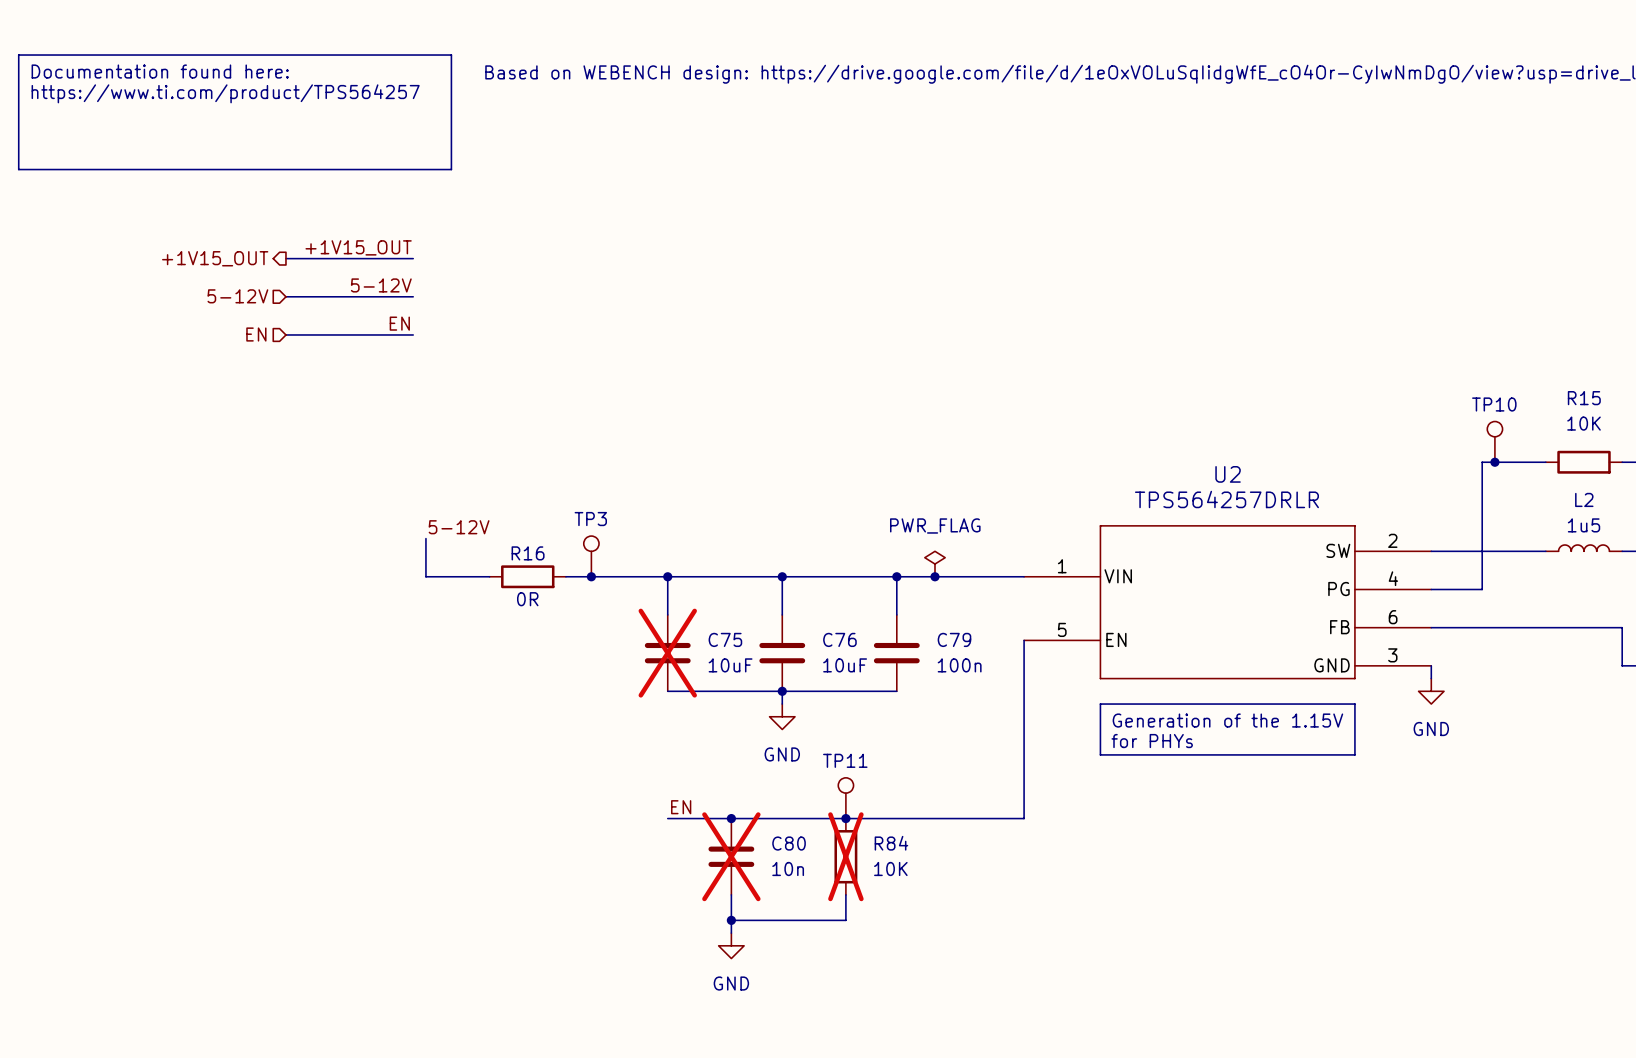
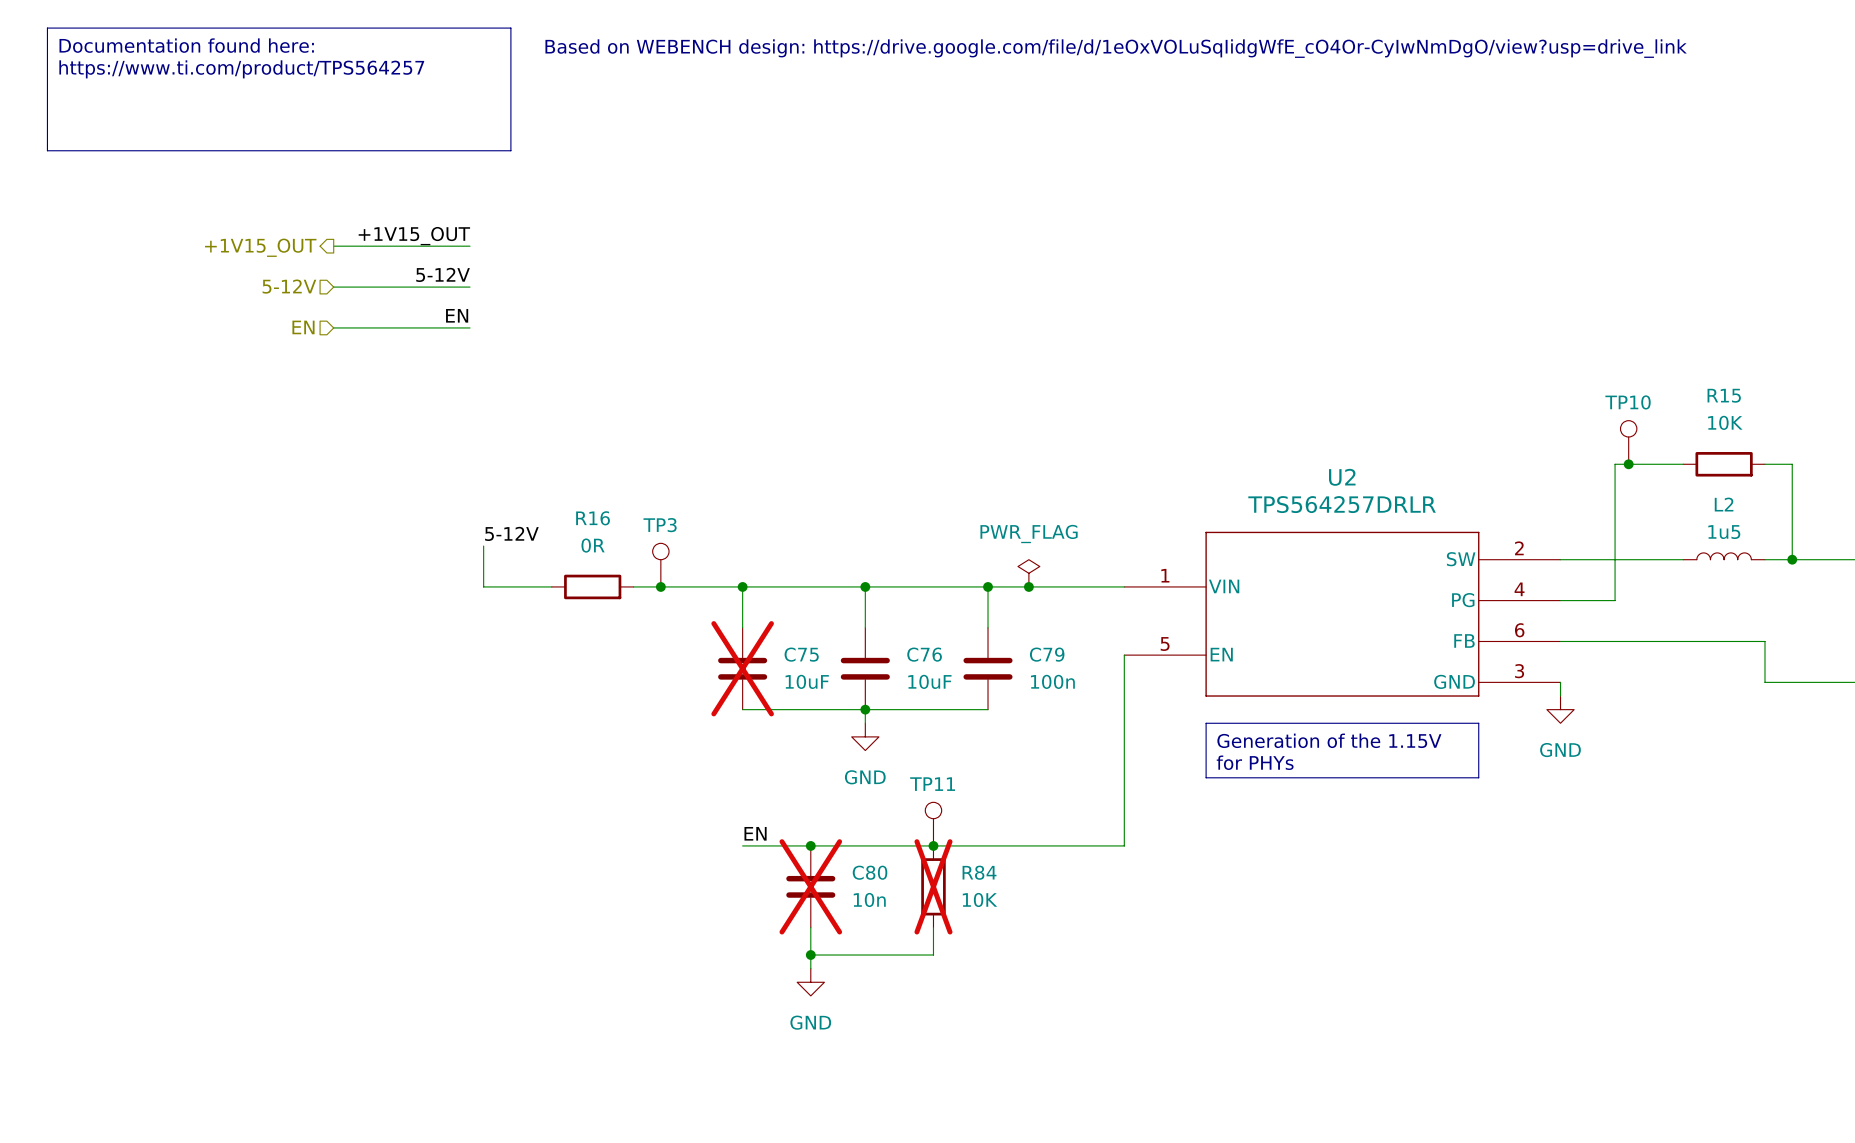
R16 name position: R16 (528, 553) -> R16 (593, 518)
R16 value position: 0R (527, 599) -> 0R (593, 545)

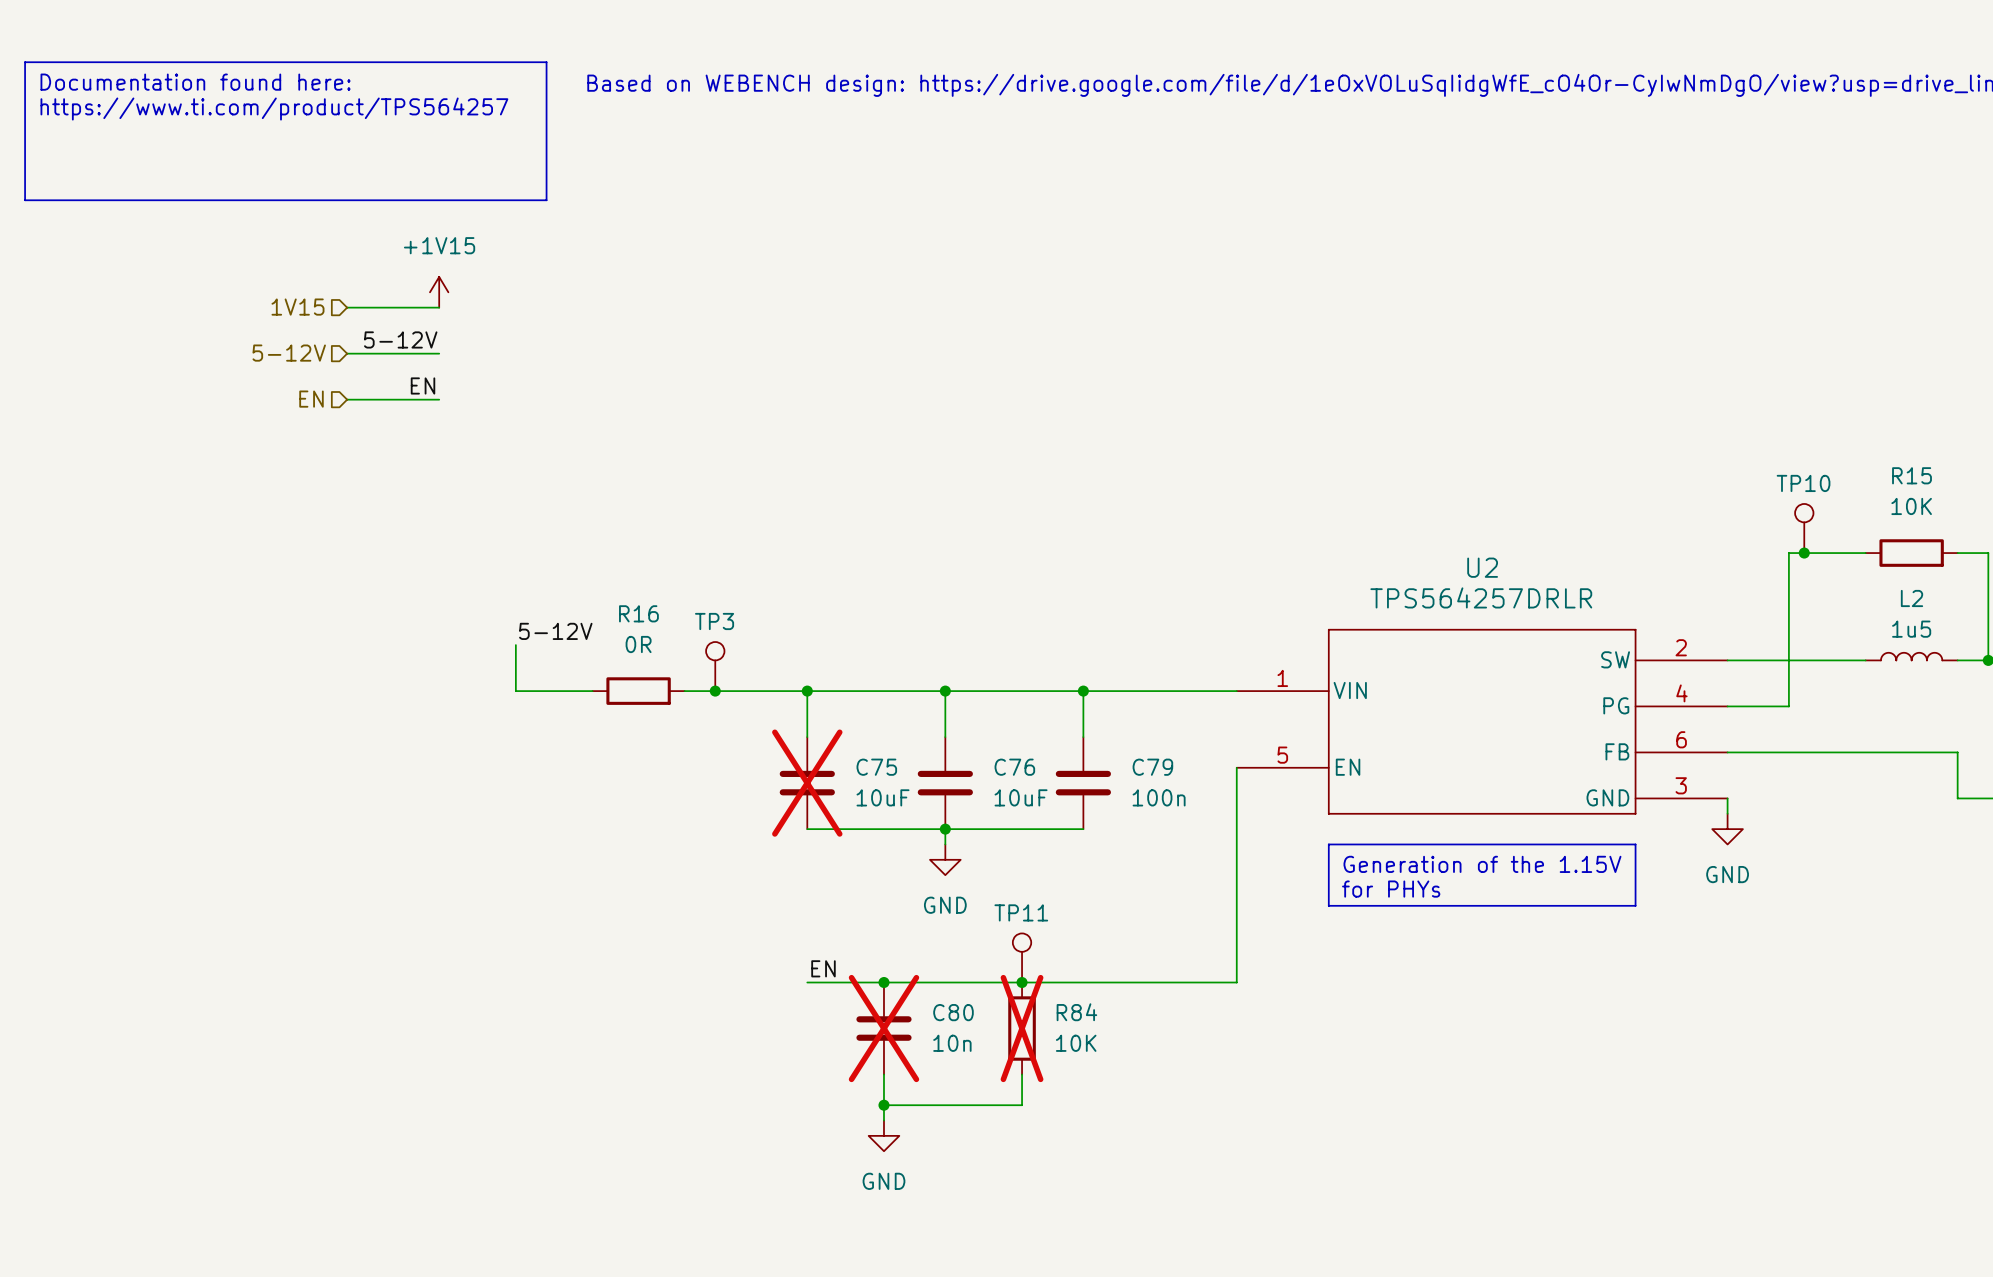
power symbol: none -> +1V15 (439, 292)
label: +1V15_OUT (414, 236) -> none
wire: (415, 246) (470, 246) -> none
hierarchical label shape: output (260, 247) -> input (297, 307)
hierarchical label: +1V15_OUT (260, 247) -> 1V15 (297, 307)
label position: 5-12V (443, 274) -> 5-12V (400, 339)
wire: (415, 287) (470, 287) -> none
label position: EN (457, 315) -> EN (423, 385)
wire: (415, 327) (470, 327) -> none
power symbol: PWR_FLAG (1028, 573) -> none
junction: (1028, 586) -> none

